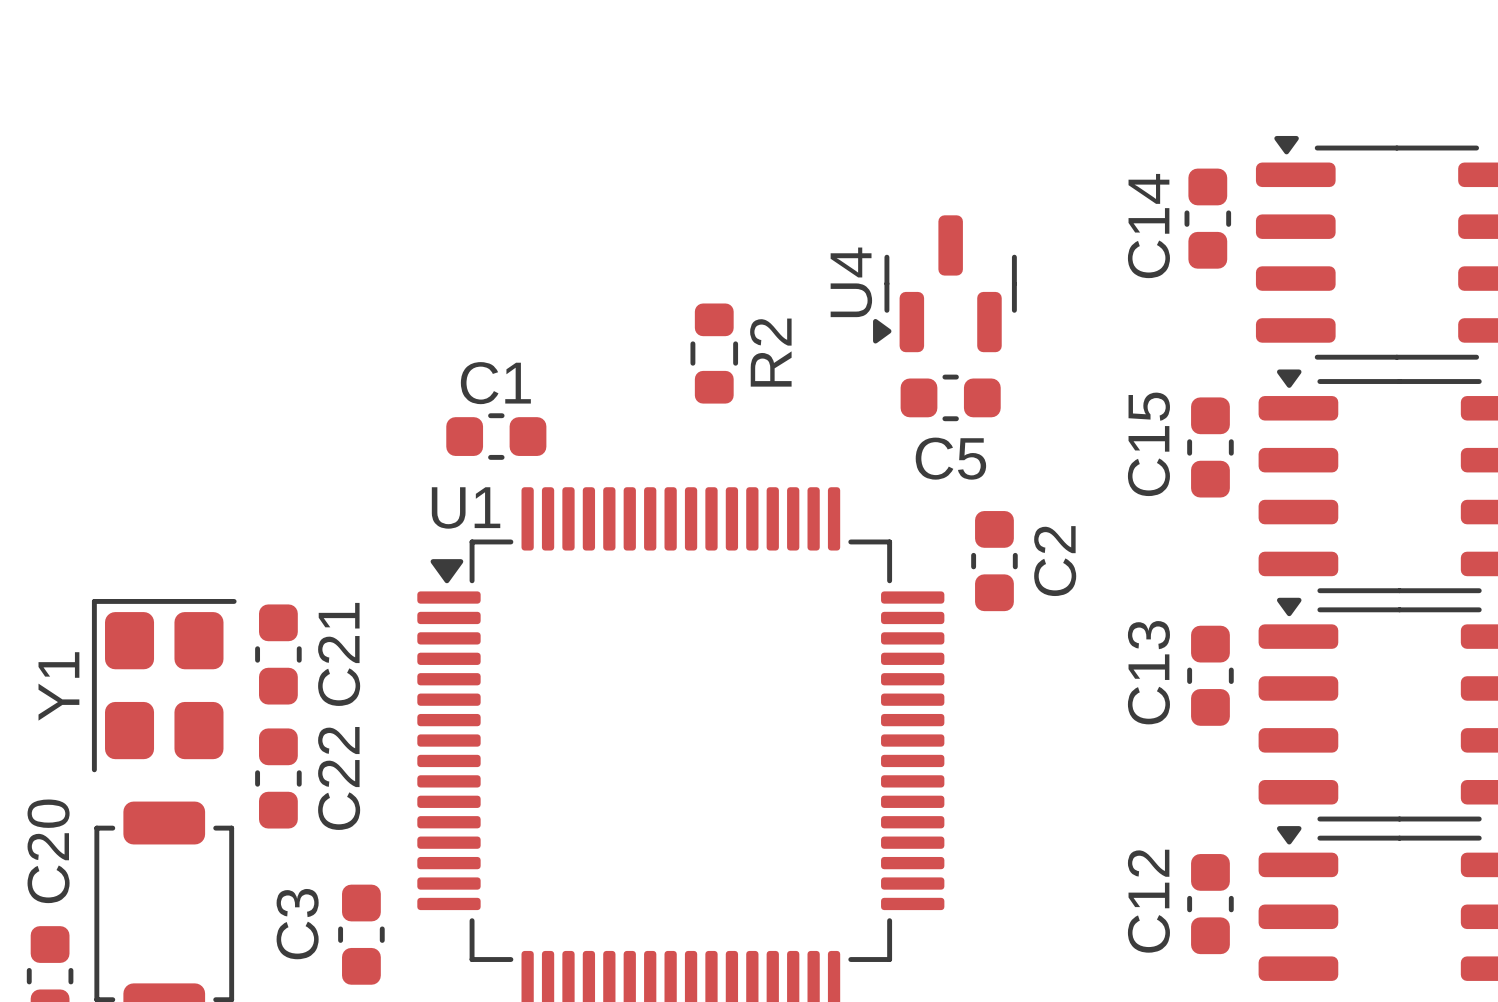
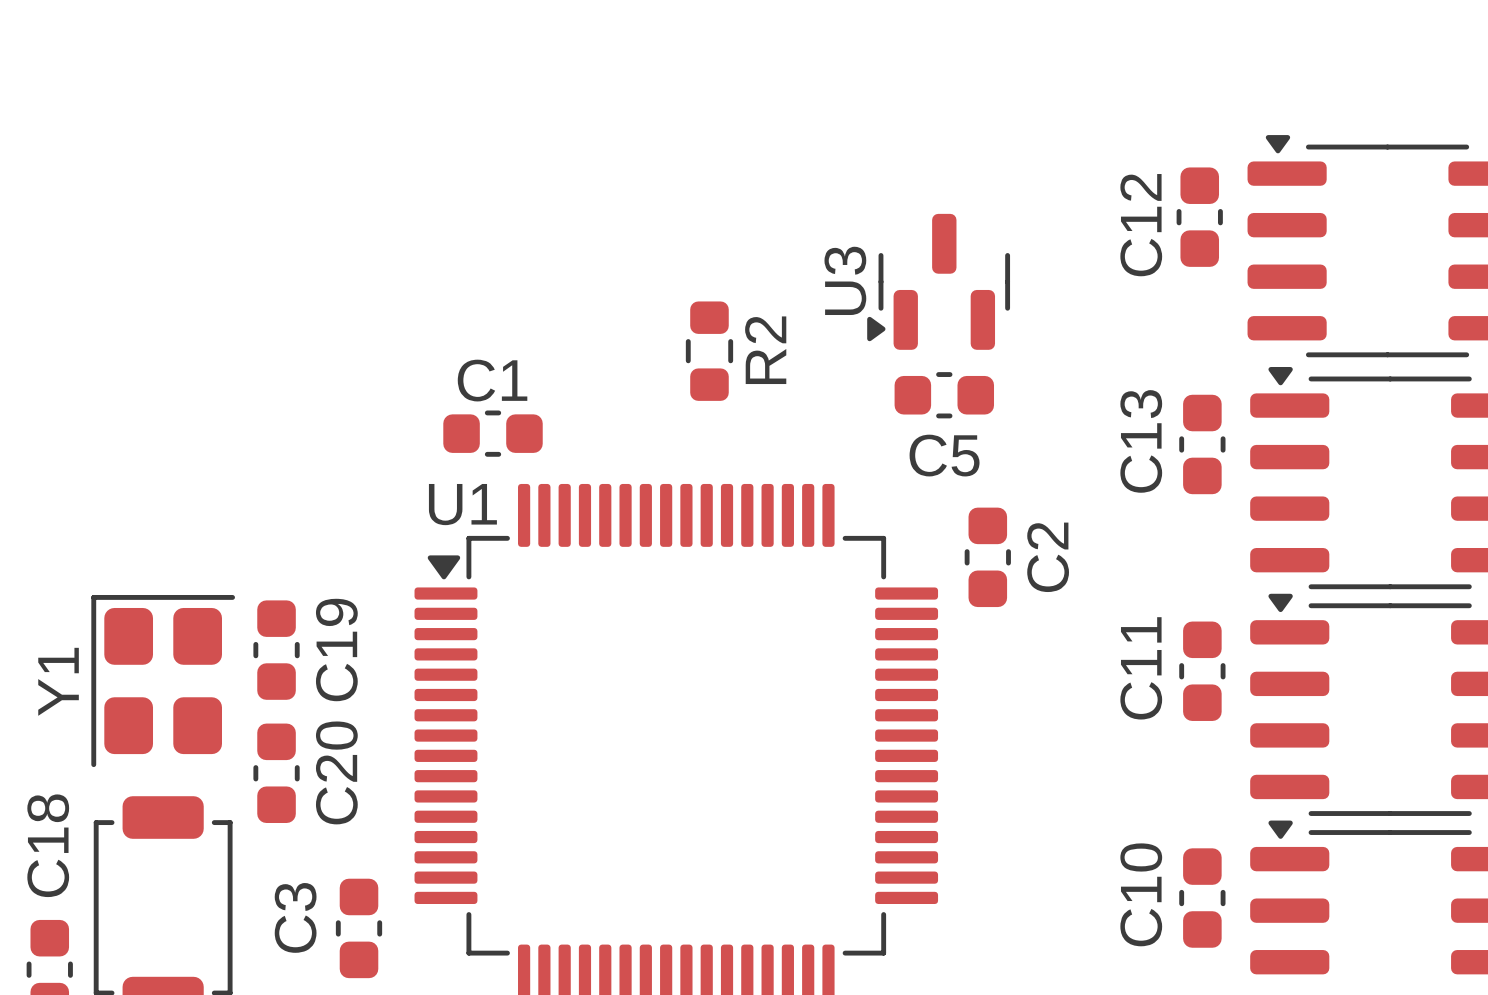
C14 name: C14 (1148, 226) -> C12 (1141, 225)
U4 name: U4 (851, 282) -> U3 (845, 280)
C15 name: C15 (1148, 444) -> C13 (1141, 441)
C21 name: C21 (339, 654) -> C19 (336, 650)
C13 name: C13 (1148, 672) -> C11 (1141, 668)
C22 name: C22 (339, 778) -> C20 (336, 772)
C20 name: C20 (48, 851) -> C18 (48, 845)
C12 name: C12 (1148, 901) -> C10 (1141, 894)

